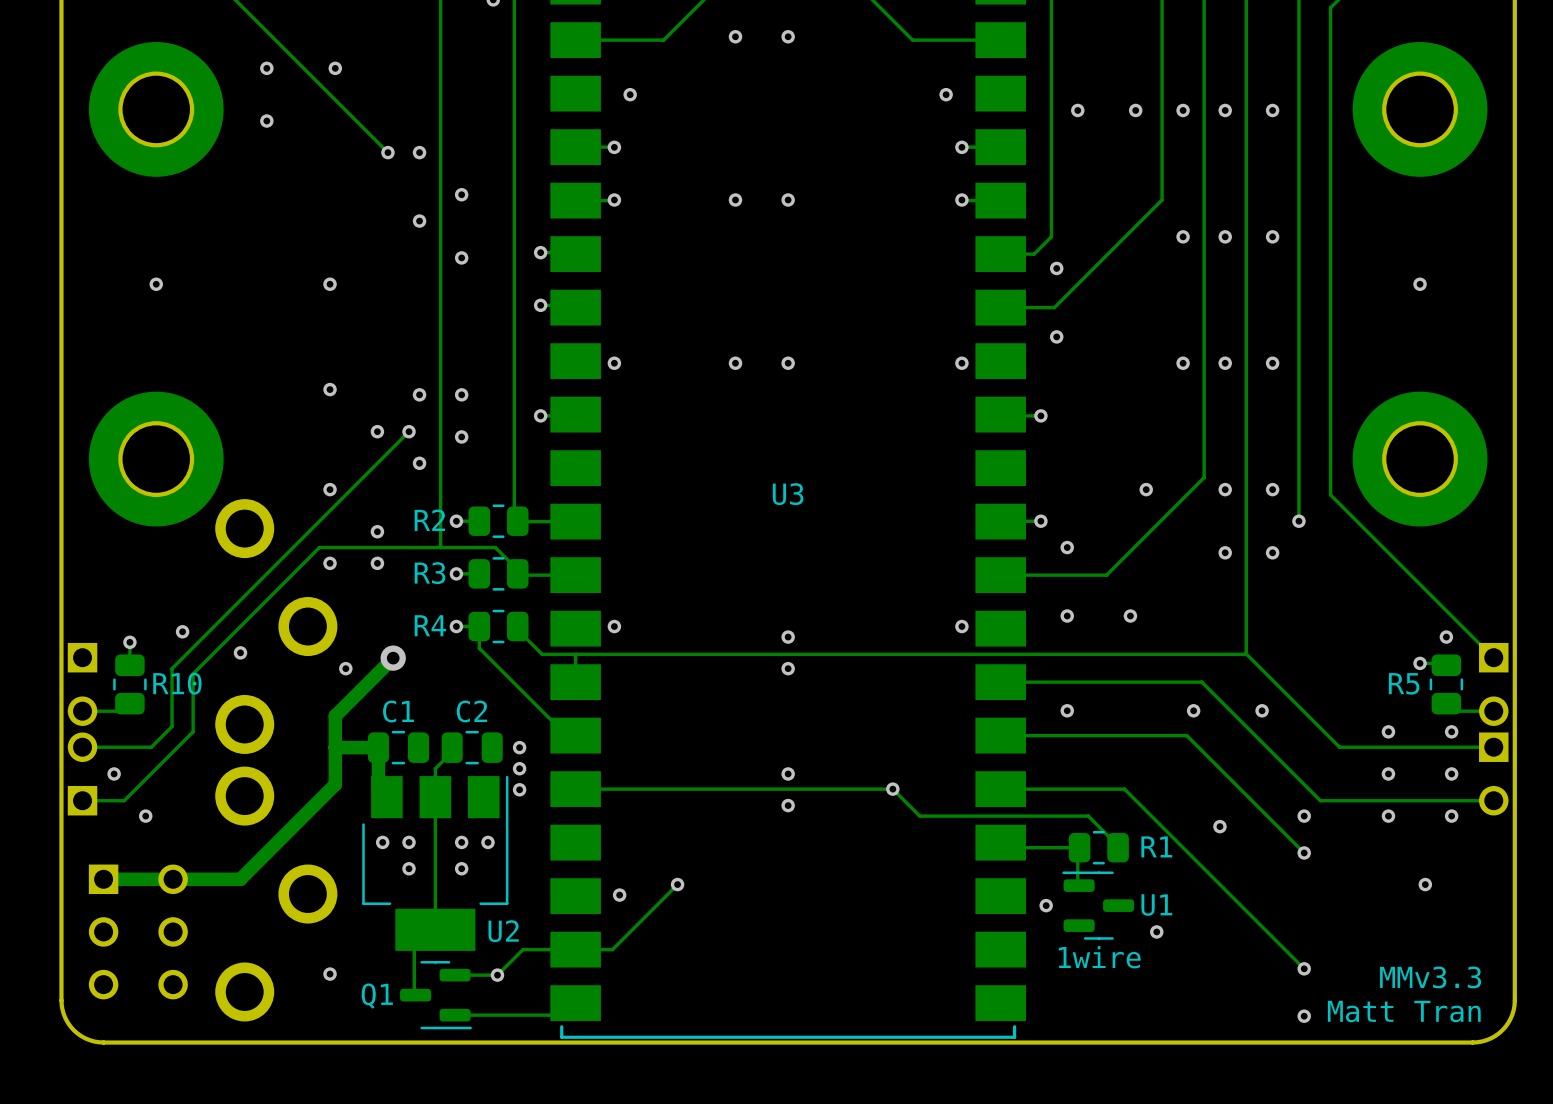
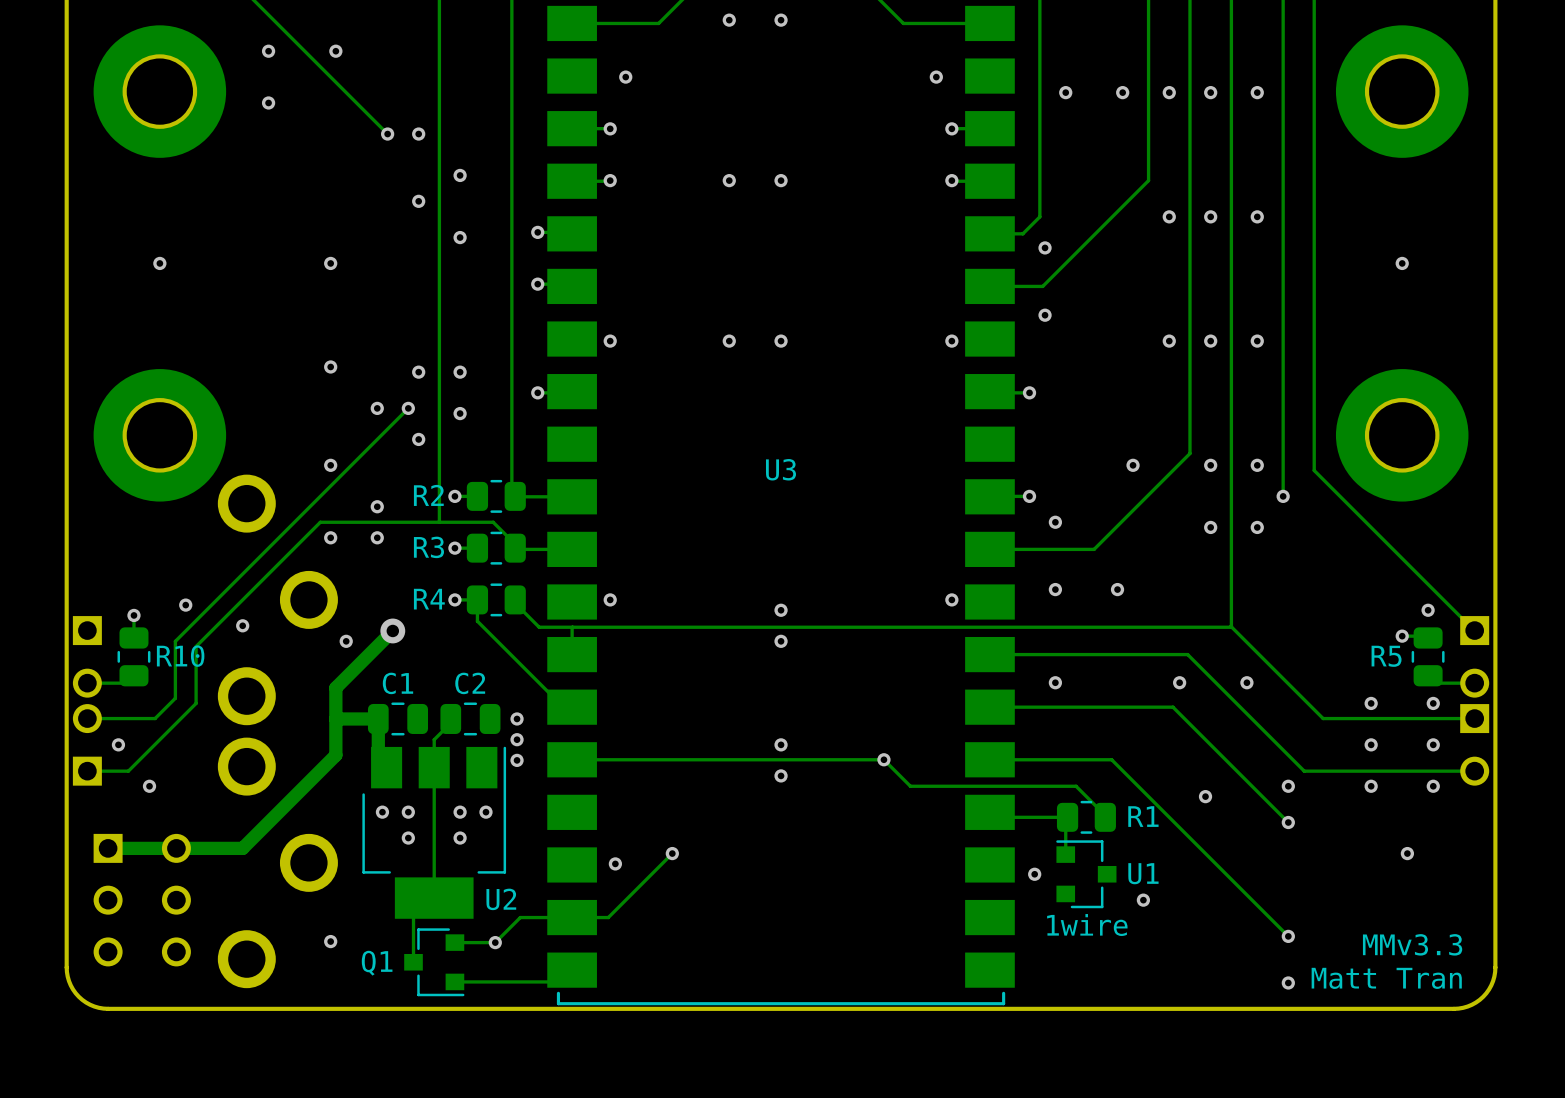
U1 footprint: [1062, 871, 1135, 940] -> [1056, 840, 1117, 909]
Q1 footprint: [400, 961, 472, 1030] -> [404, 928, 465, 997]

